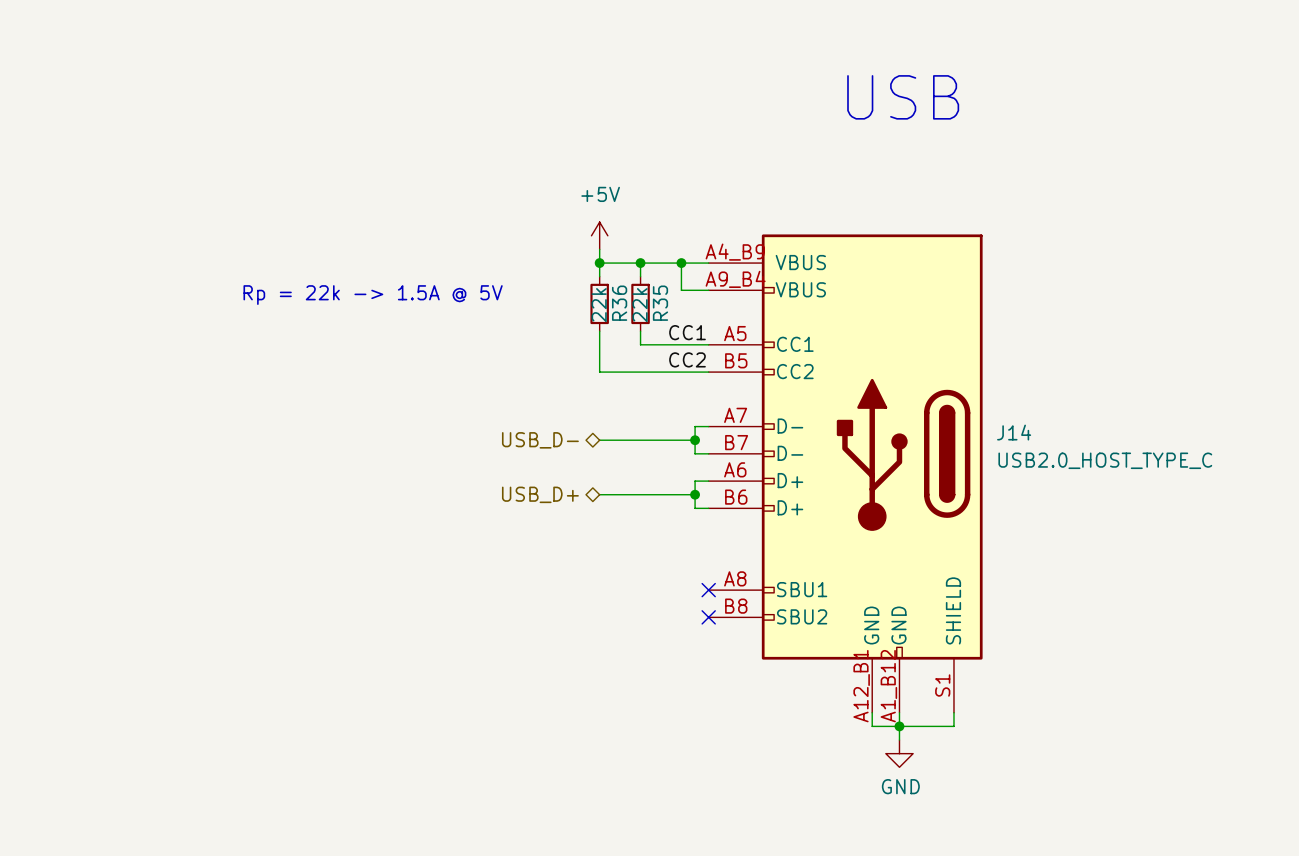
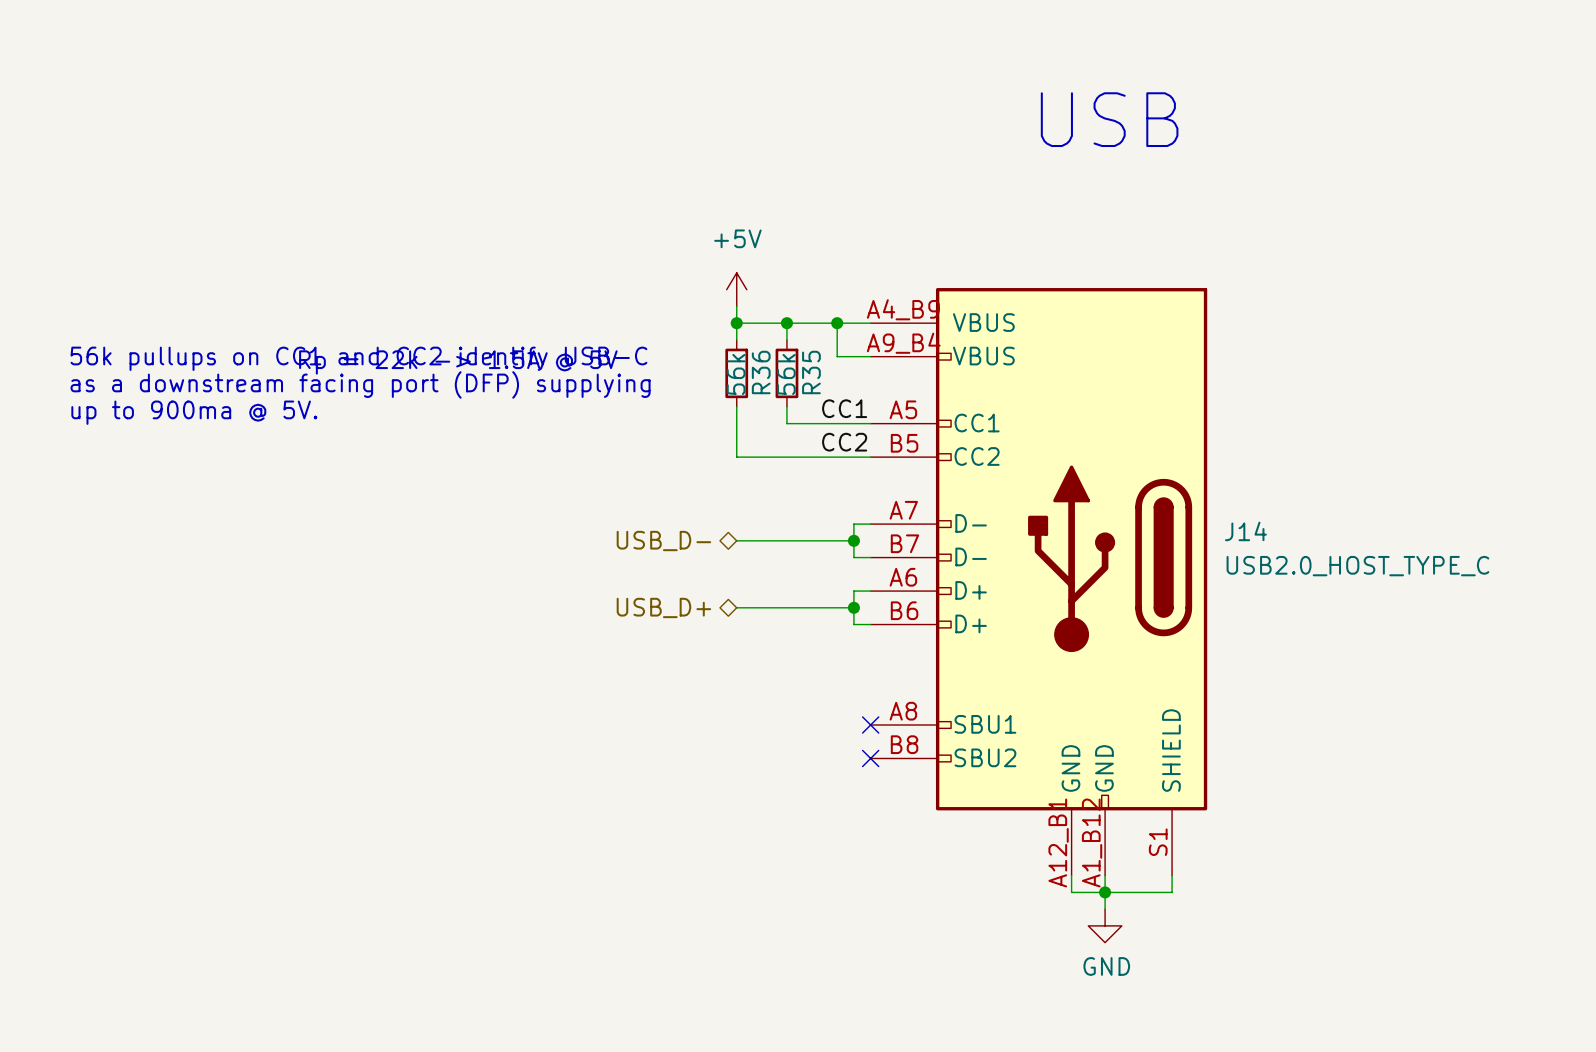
text: none -> 56k pullups on CC1 and CC2 identify USB-C (358, 358)
R36 value: 22k (599, 305) -> 56k (736, 374)
R35 value: 22k (640, 305) -> 56k (786, 374)
text: none -> as a downstream facing port (DFP) supplying (360, 384)
text: none -> up to 900ma @ 5V. (194, 412)

